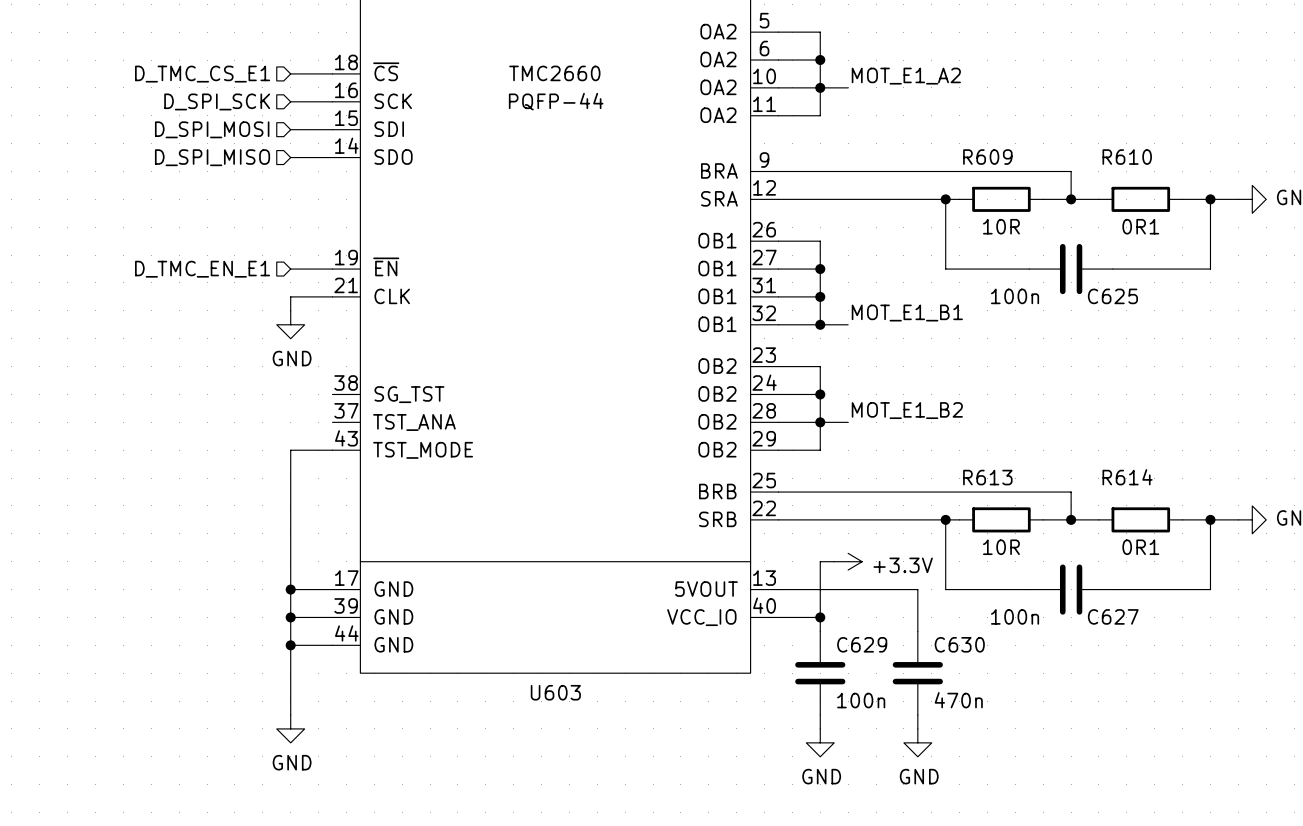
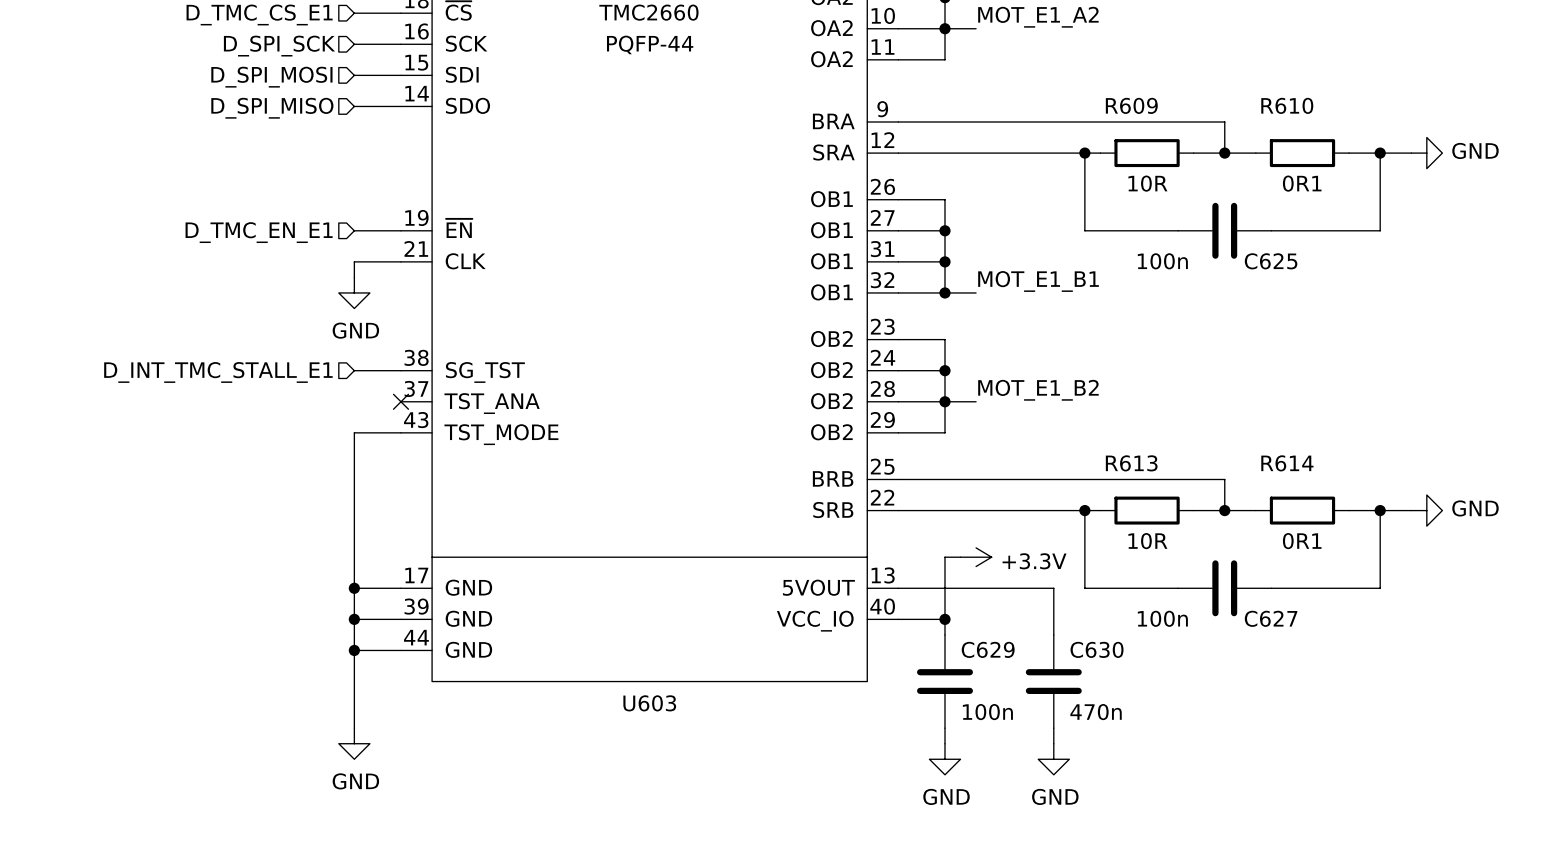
hierarchical label: none -> D_INT_TMC_STALL_E1 (218, 372)
wire: none -> (354, 370) (400, 370)
no-connect mark: none -> (400, 401)

